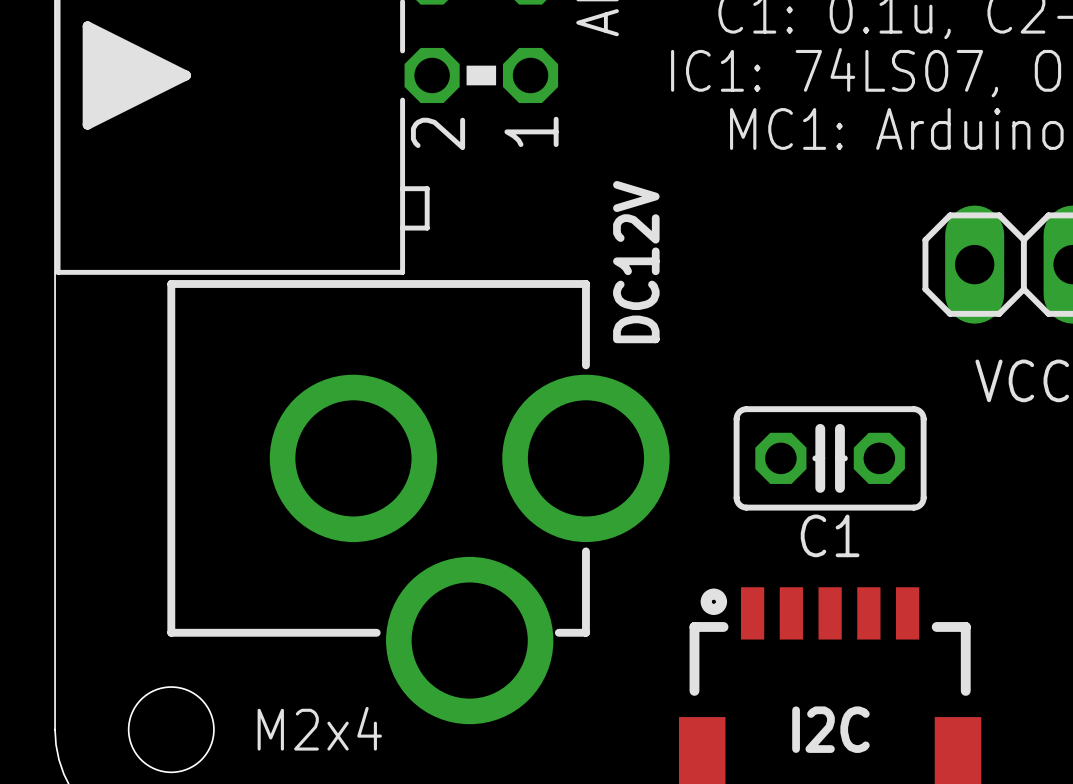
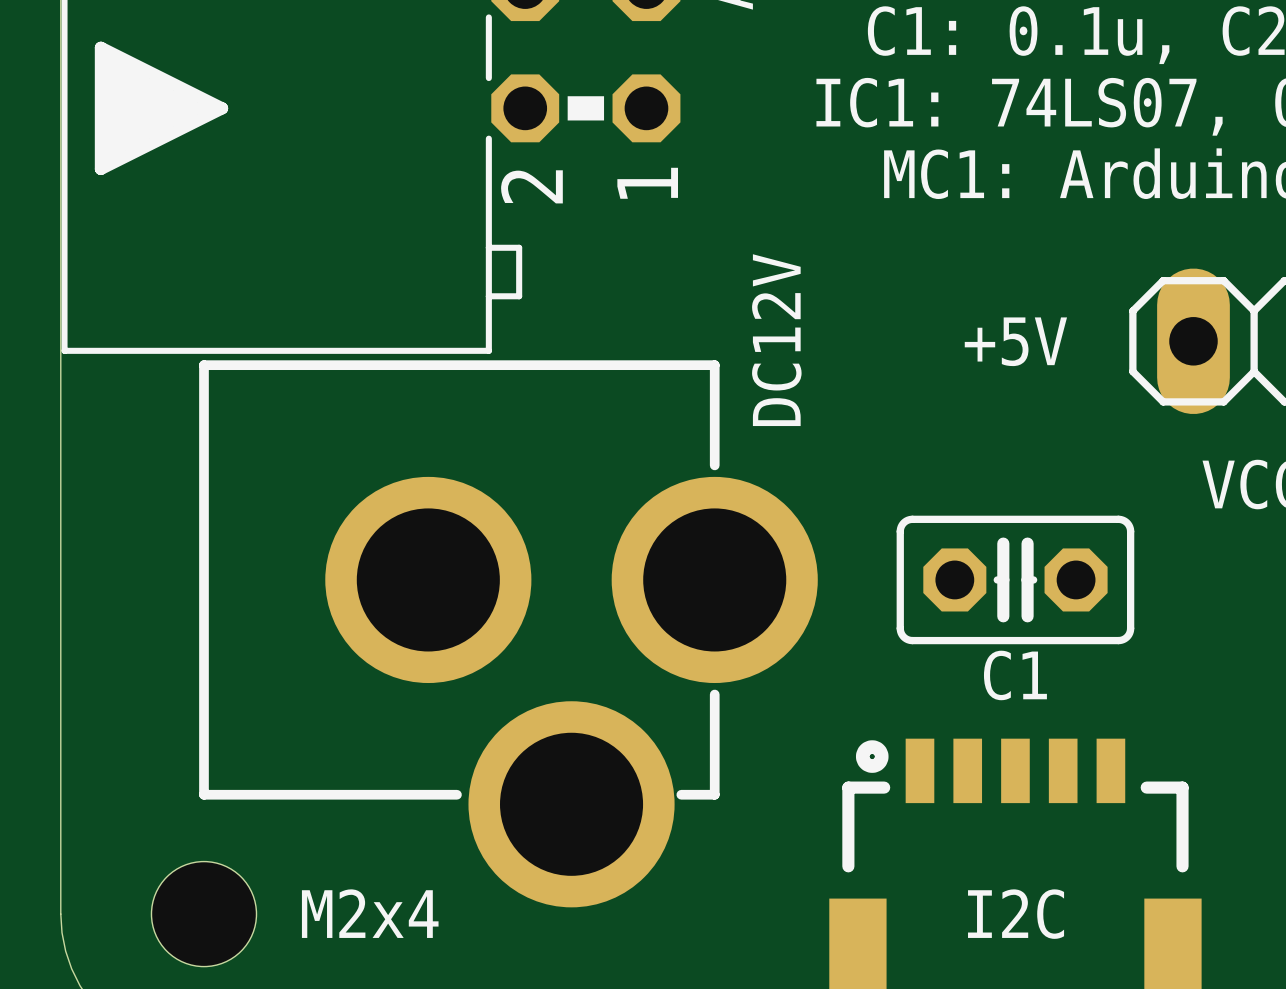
text: none -> +5V (1015, 341)

